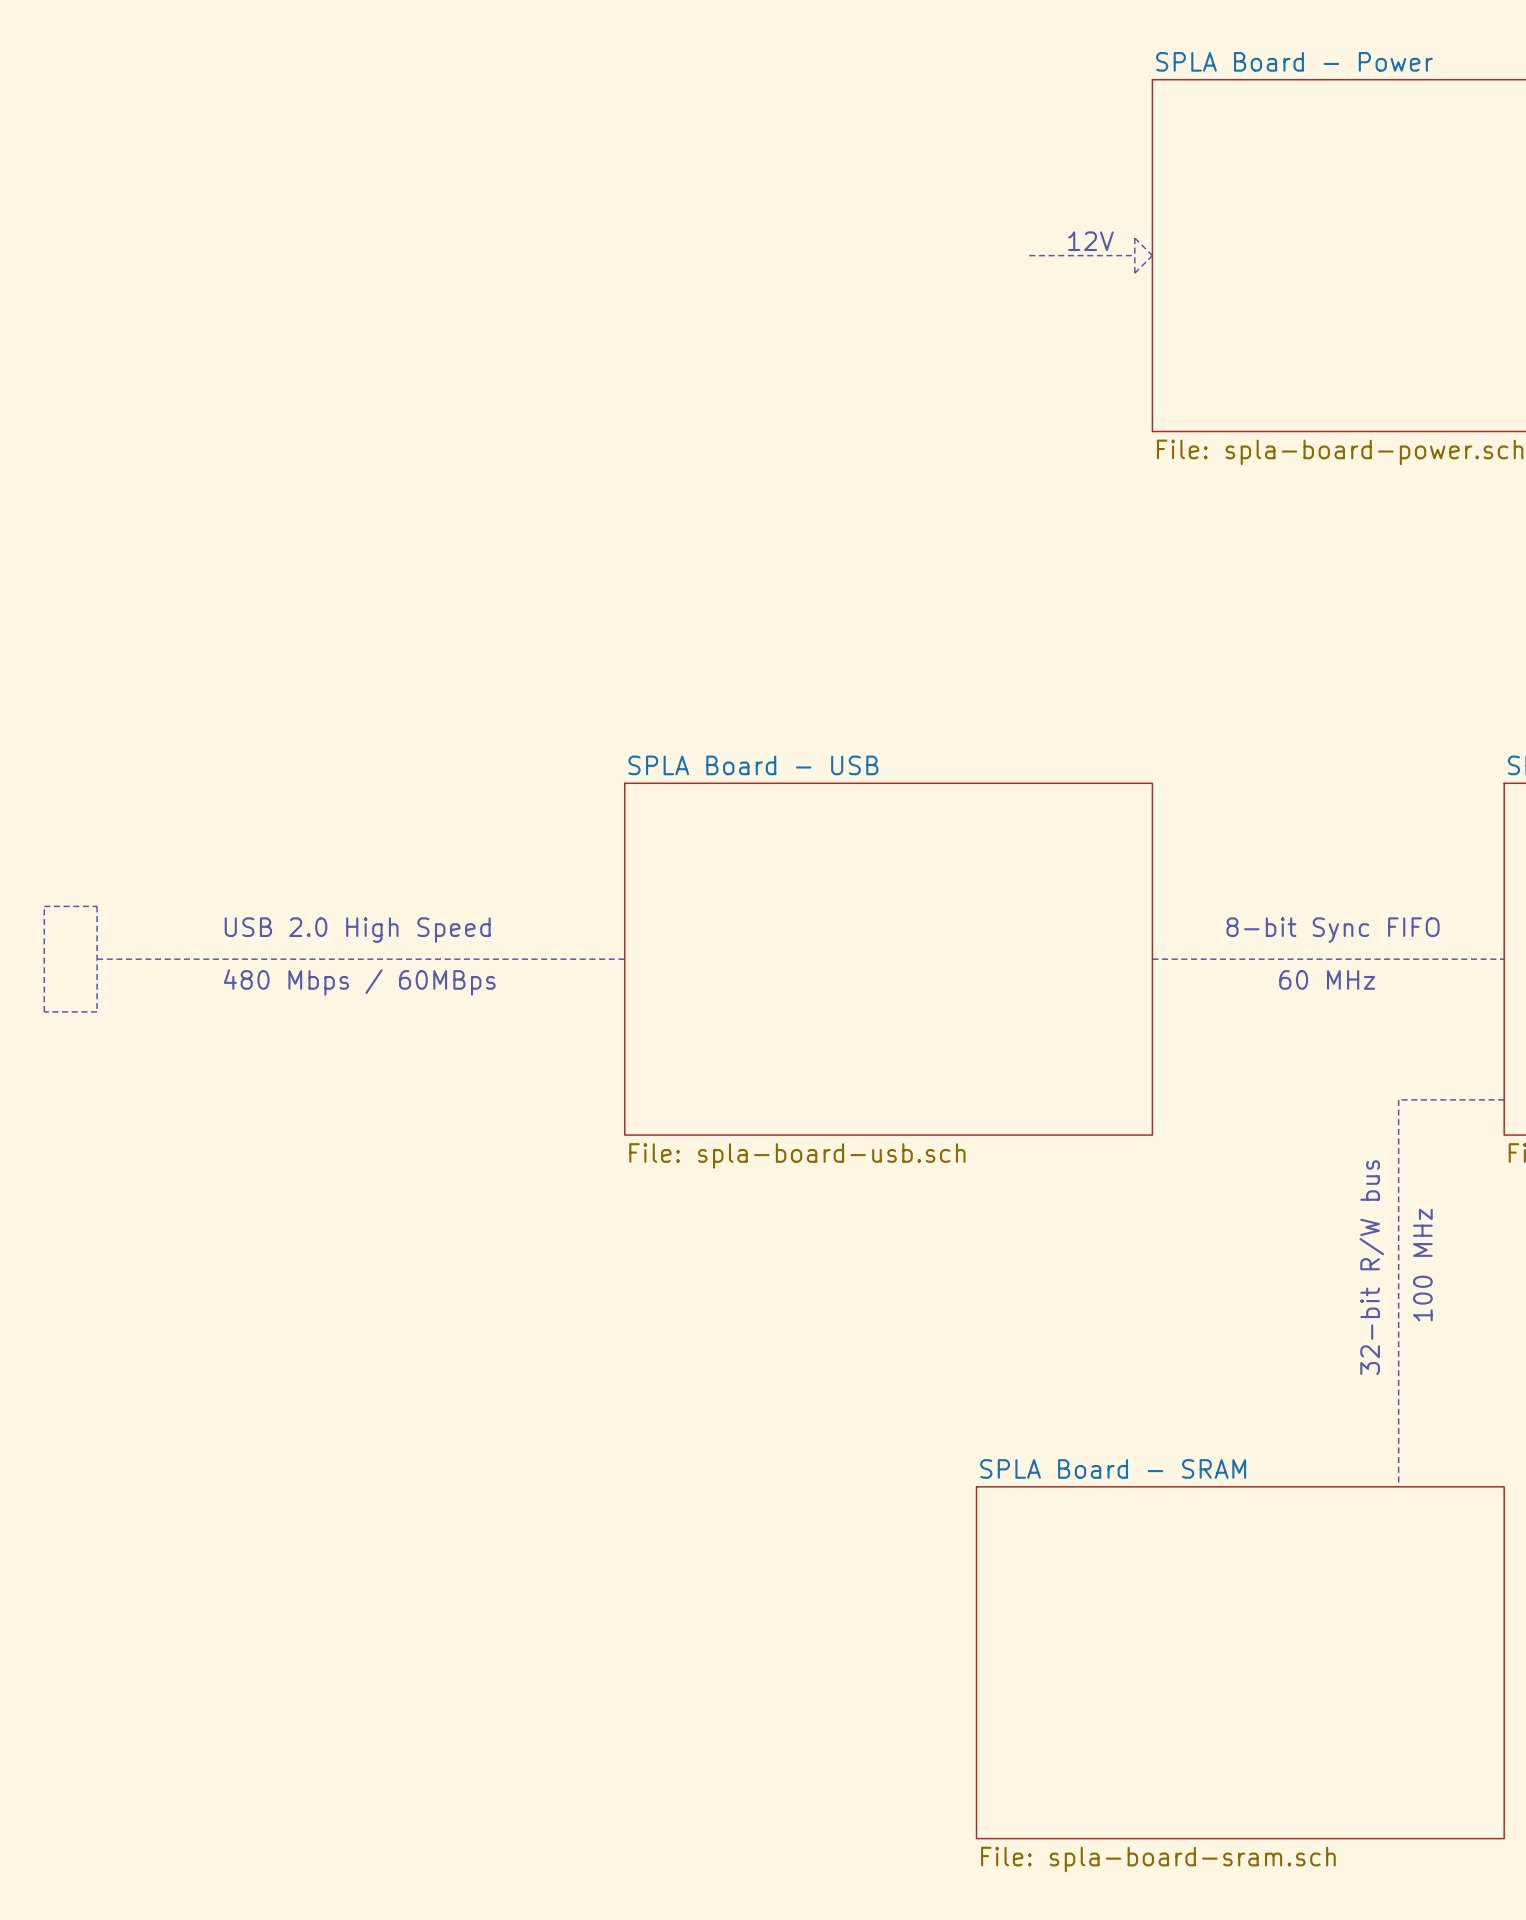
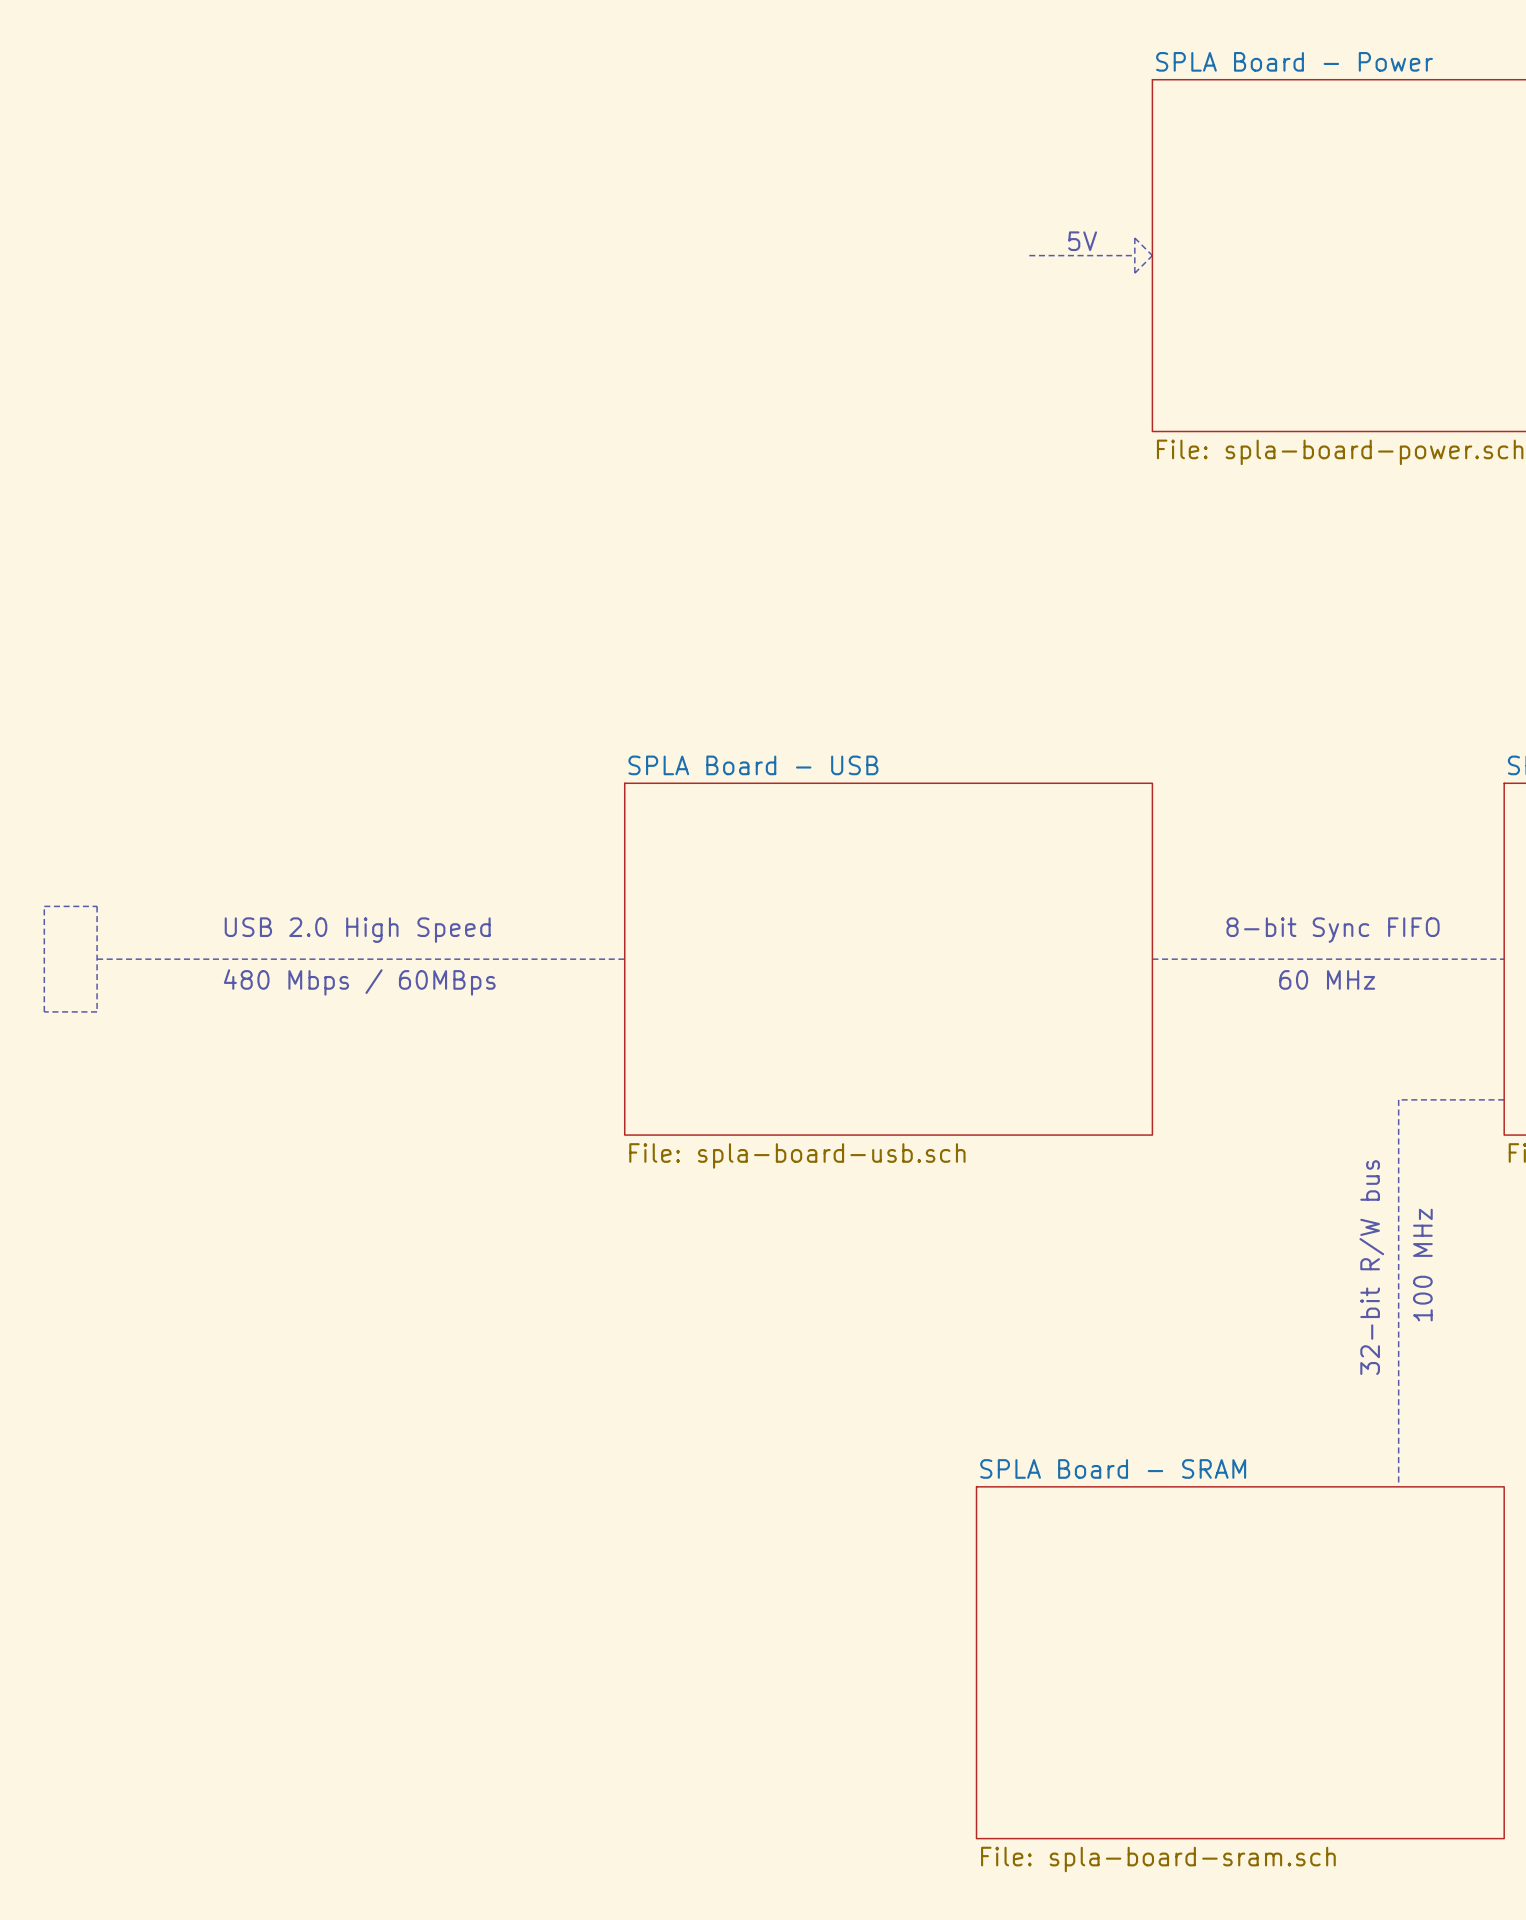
text: 12V (1090, 241) -> 5V (1082, 241)

